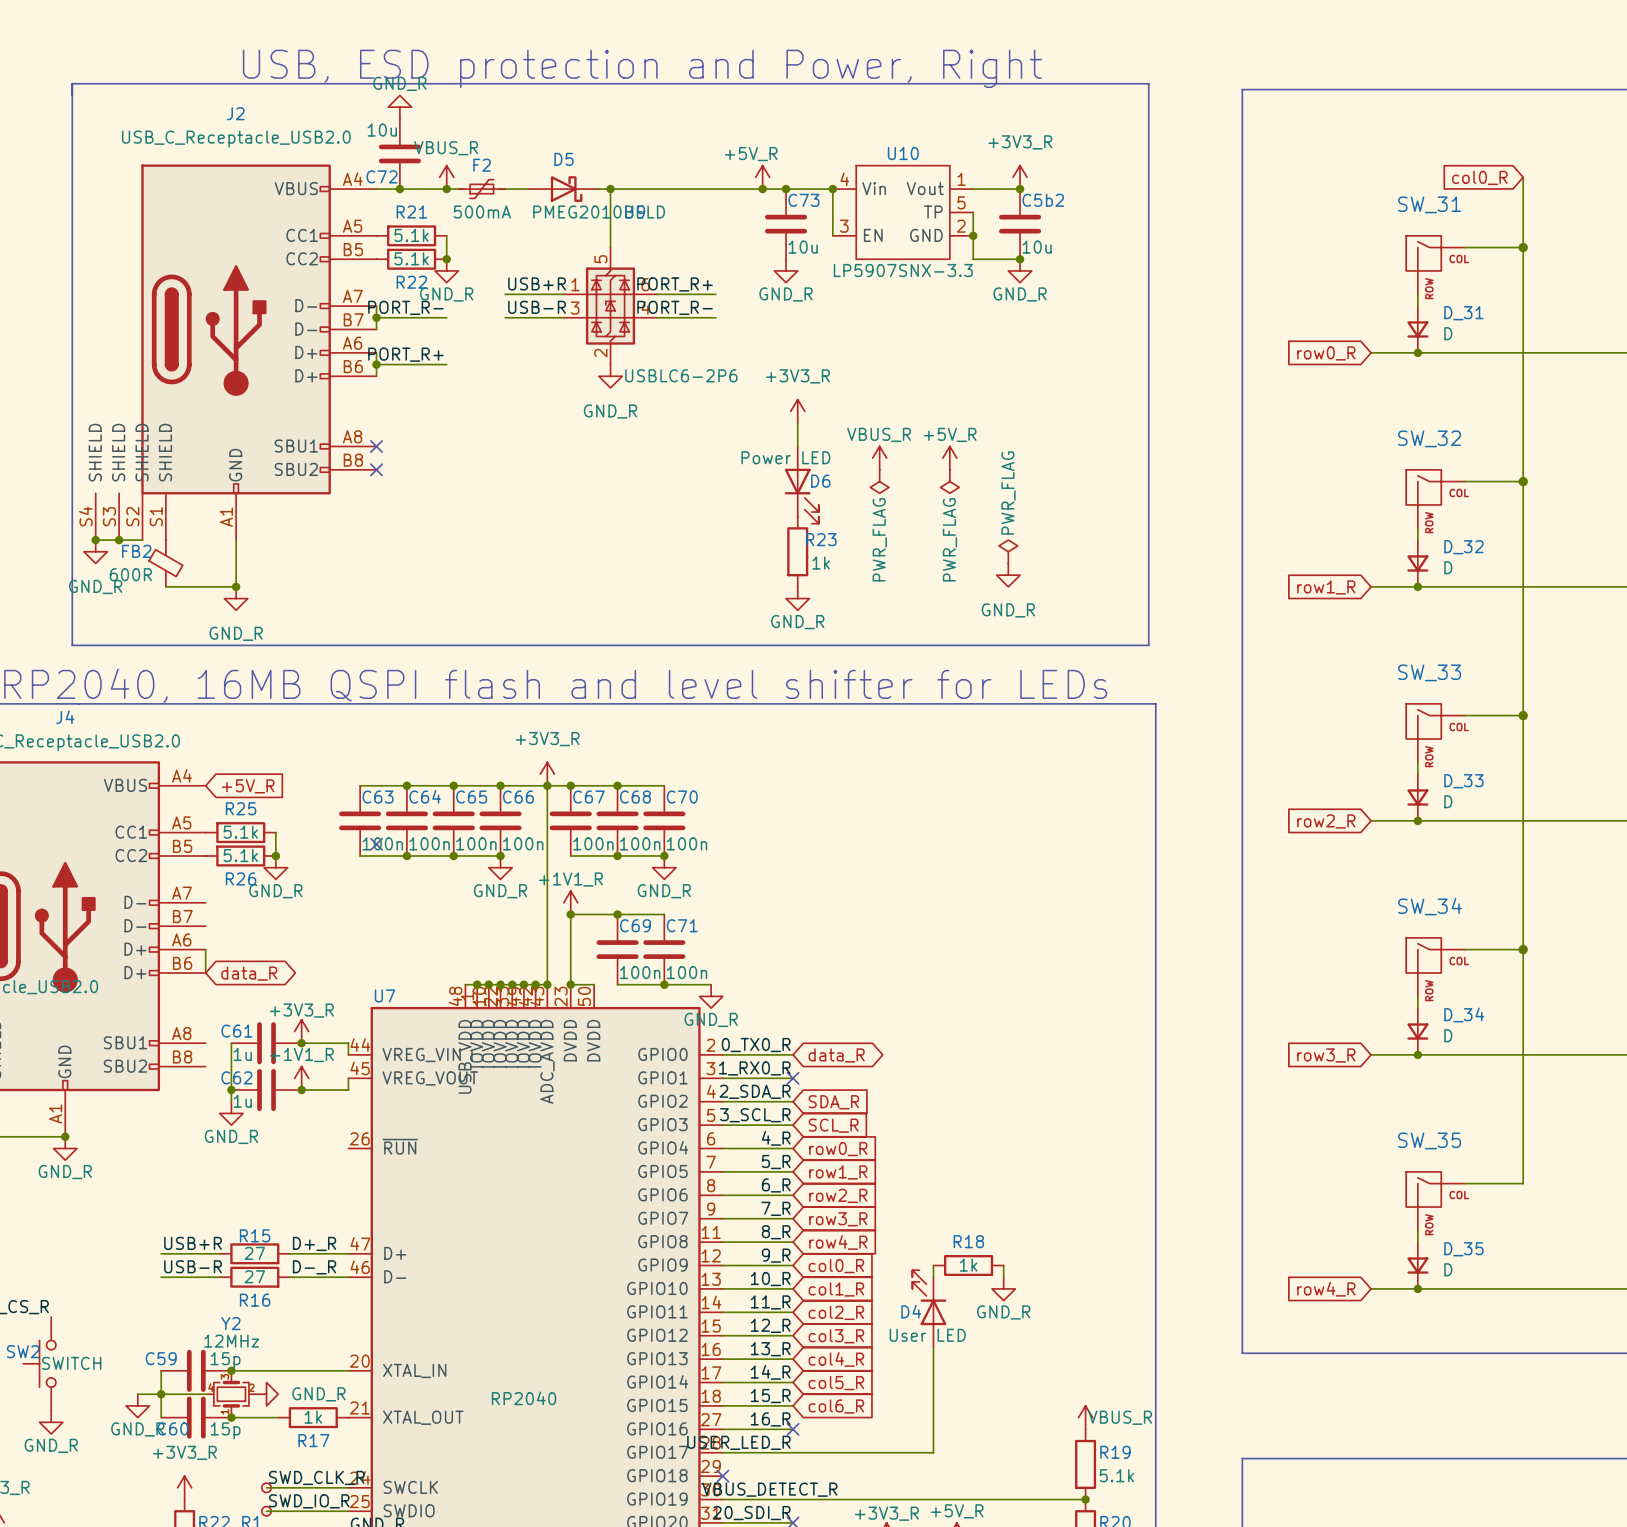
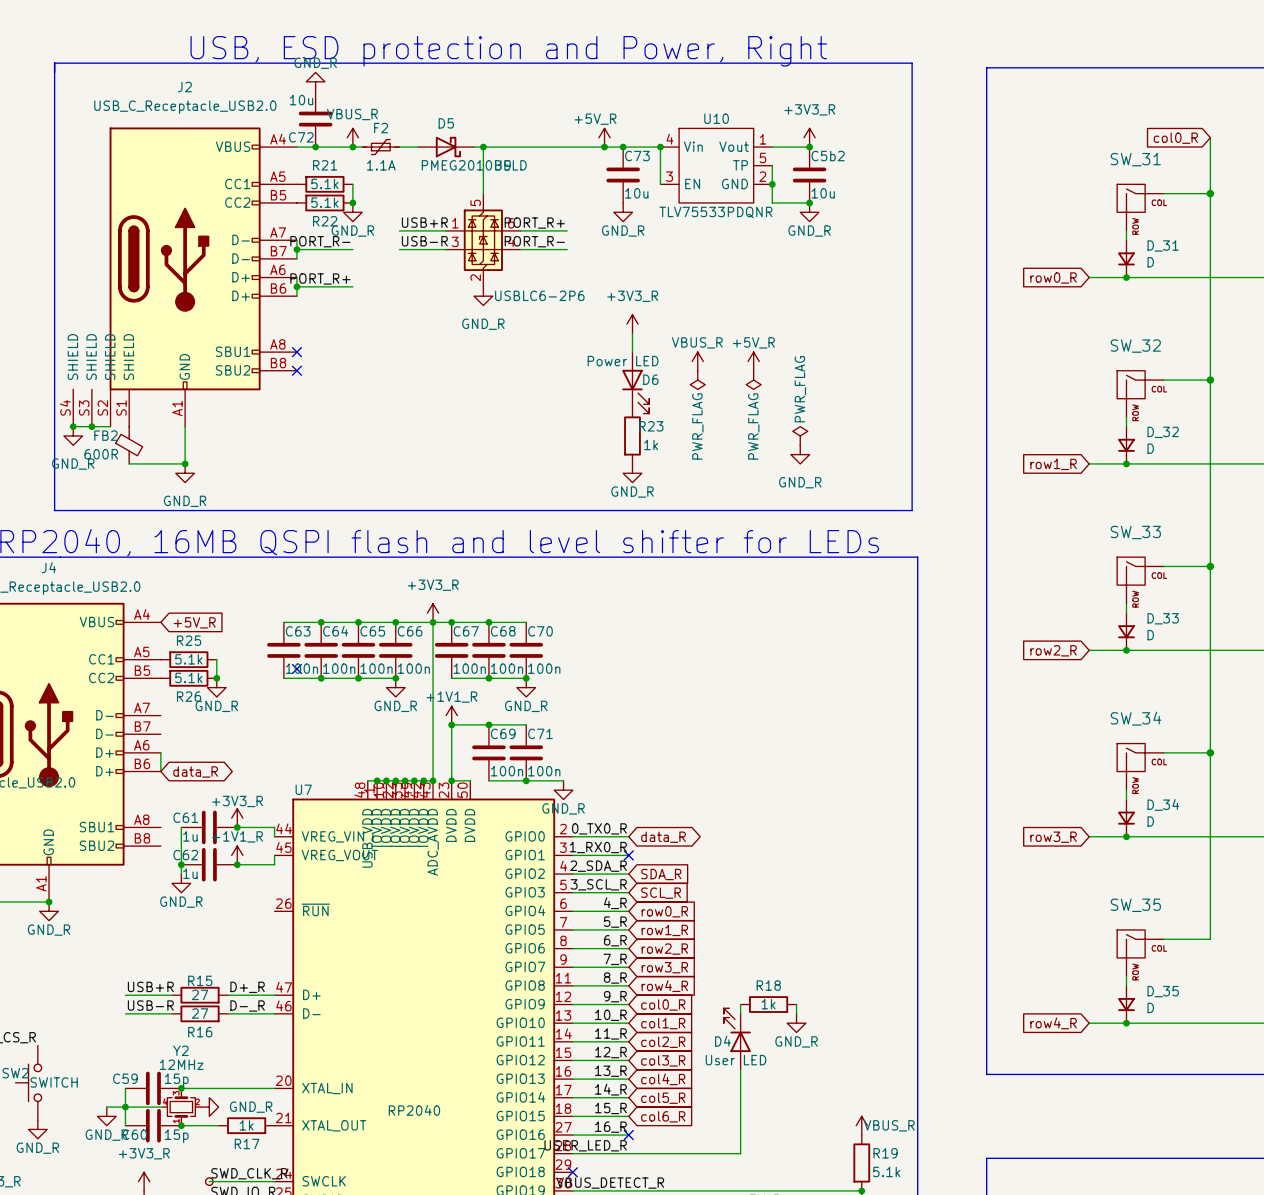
F2 value: 500mA (482, 212) -> 1.1A (381, 165)
U10 value: LP5907SNX-3.3 (903, 270) -> TLV75533PDQNR (715, 212)

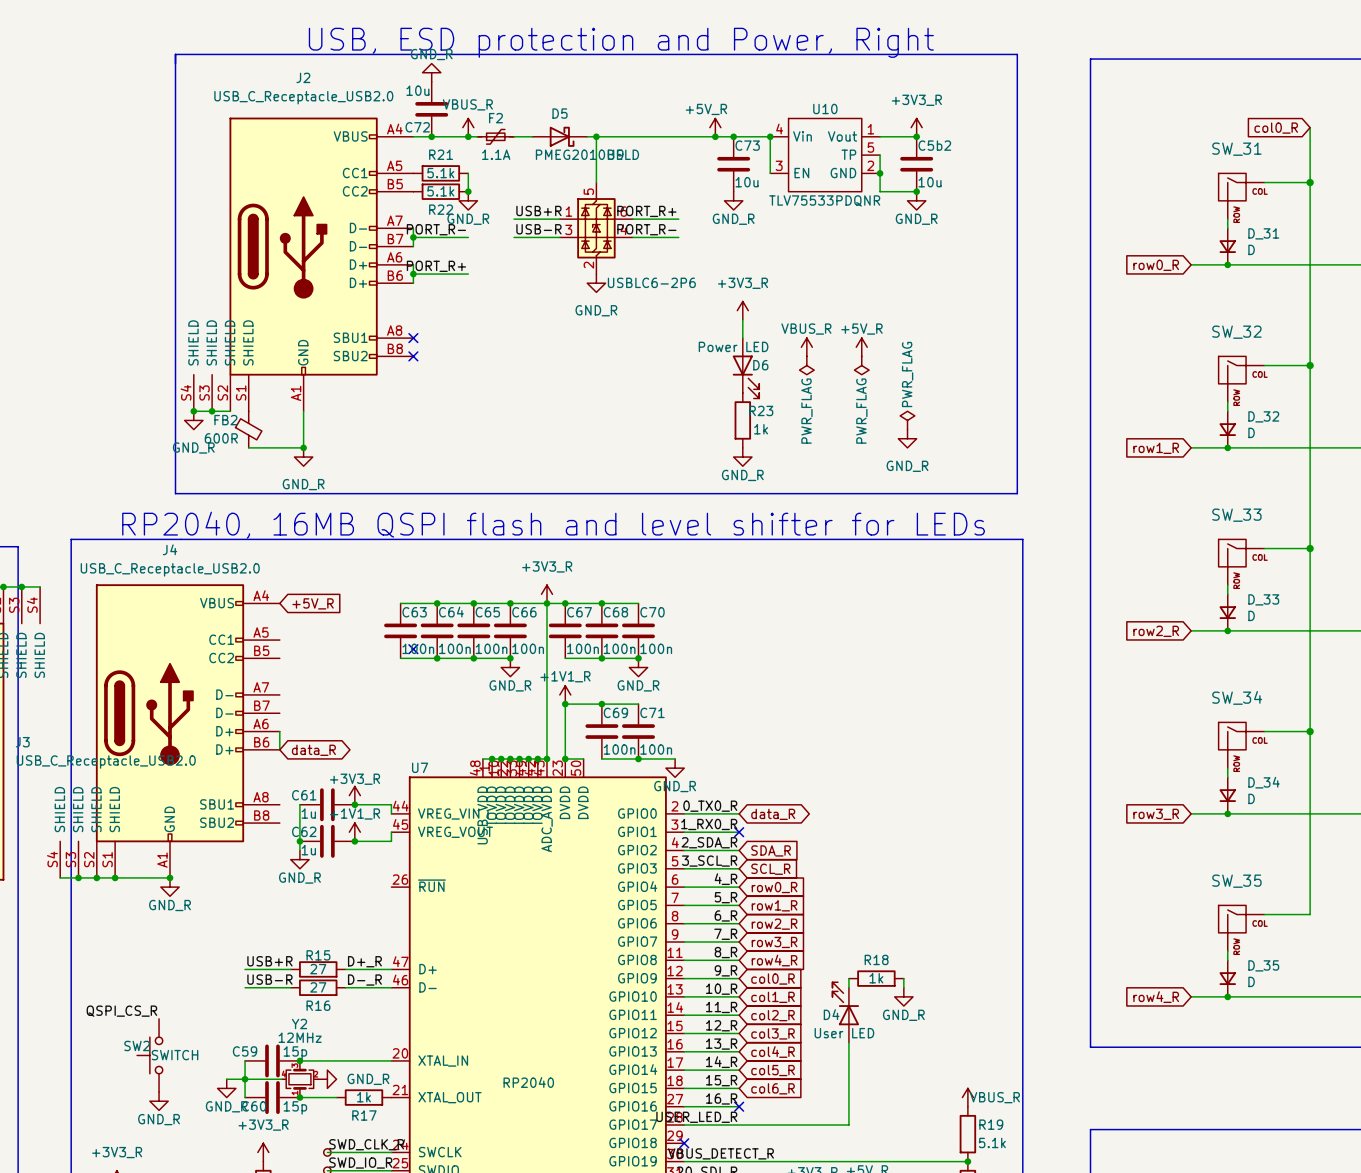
R25: 5.1k (188, 659) -> none
wire: (216, 659) (216, 678) -> none
R26: 5.1k (188, 678) -> none
junction: (216, 678) -> none
power symbol: GND_R (216, 687) -> none

